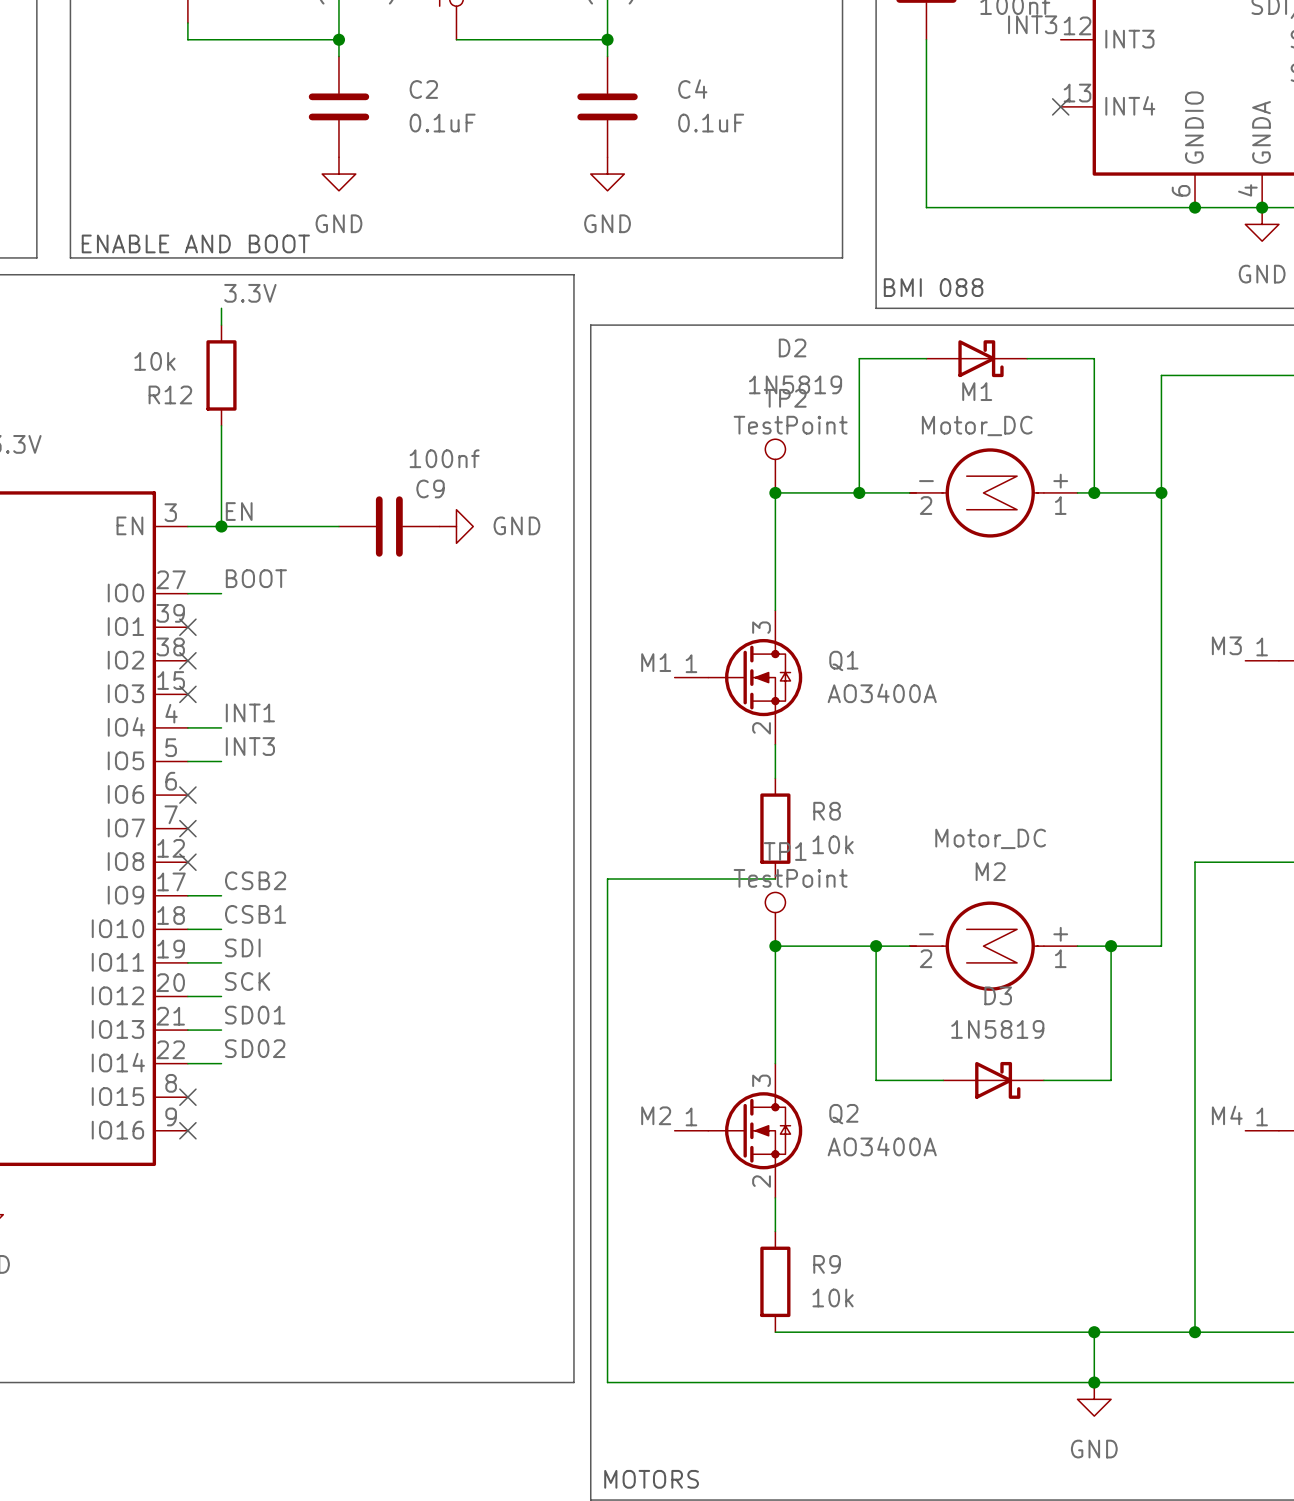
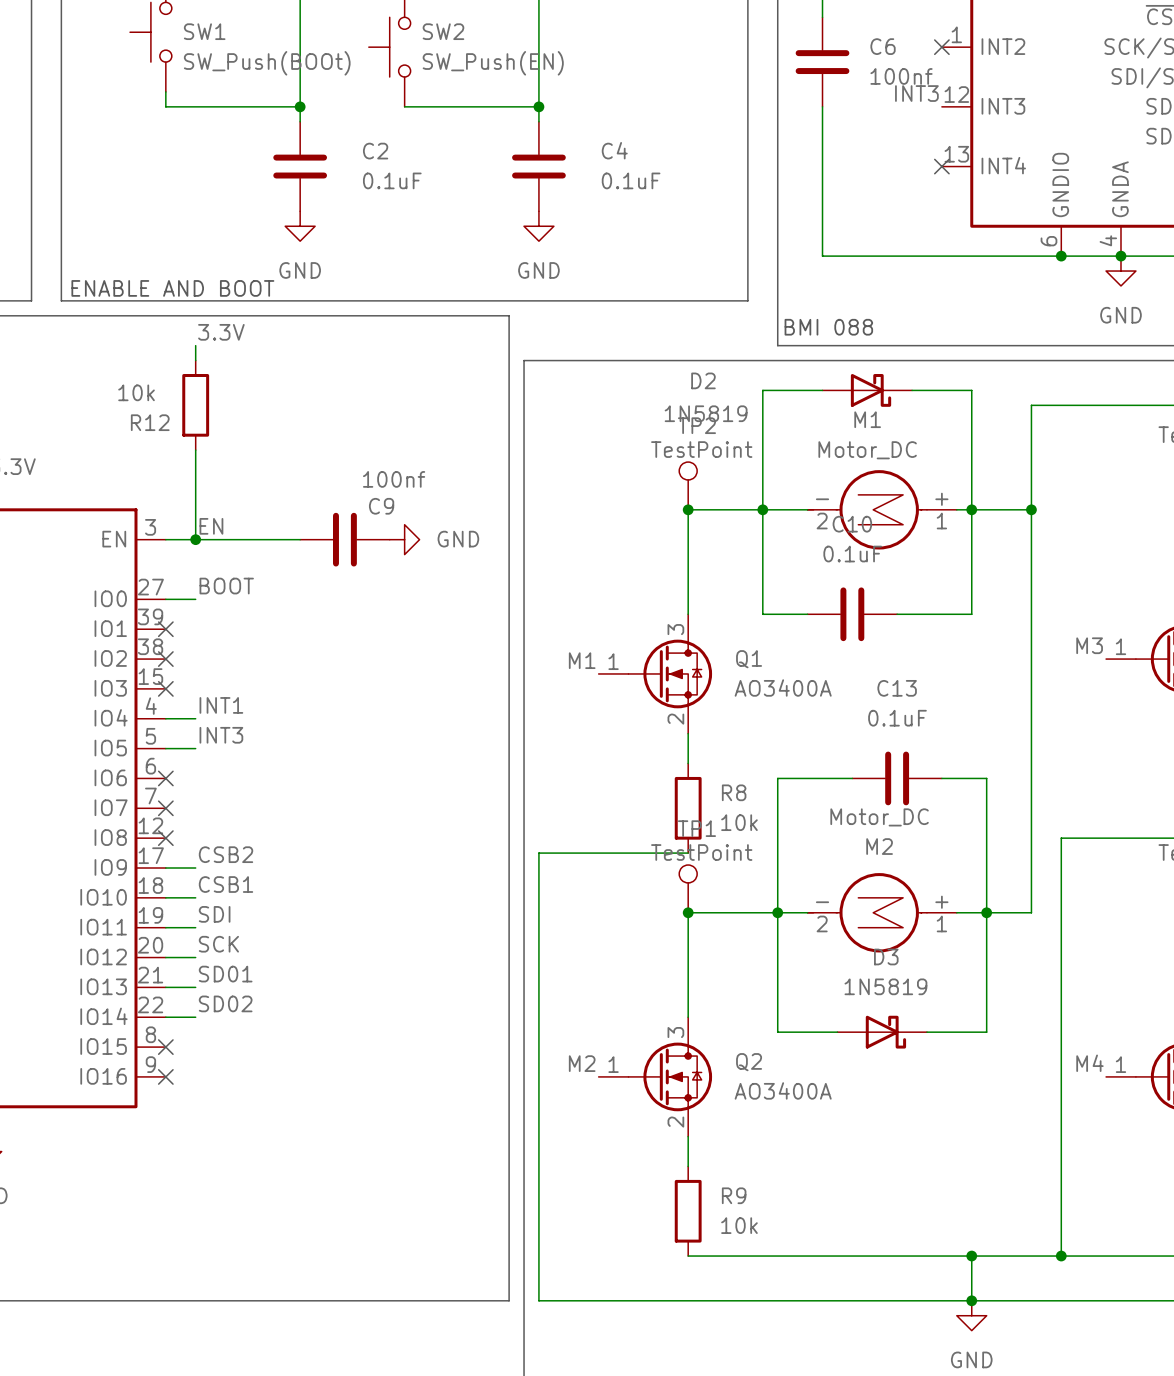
wire: none -> (762, 509) (762, 614) (807, 614)
wire: none -> (971, 509) (971, 614) (897, 614)
C10: none -> 0.1uF (852, 614)
wire: none -> (852, 778) (777, 778) (777, 912)
C13: none -> 0.1uF (897, 778)
wire: none -> (941, 778) (986, 778) (986, 912)

